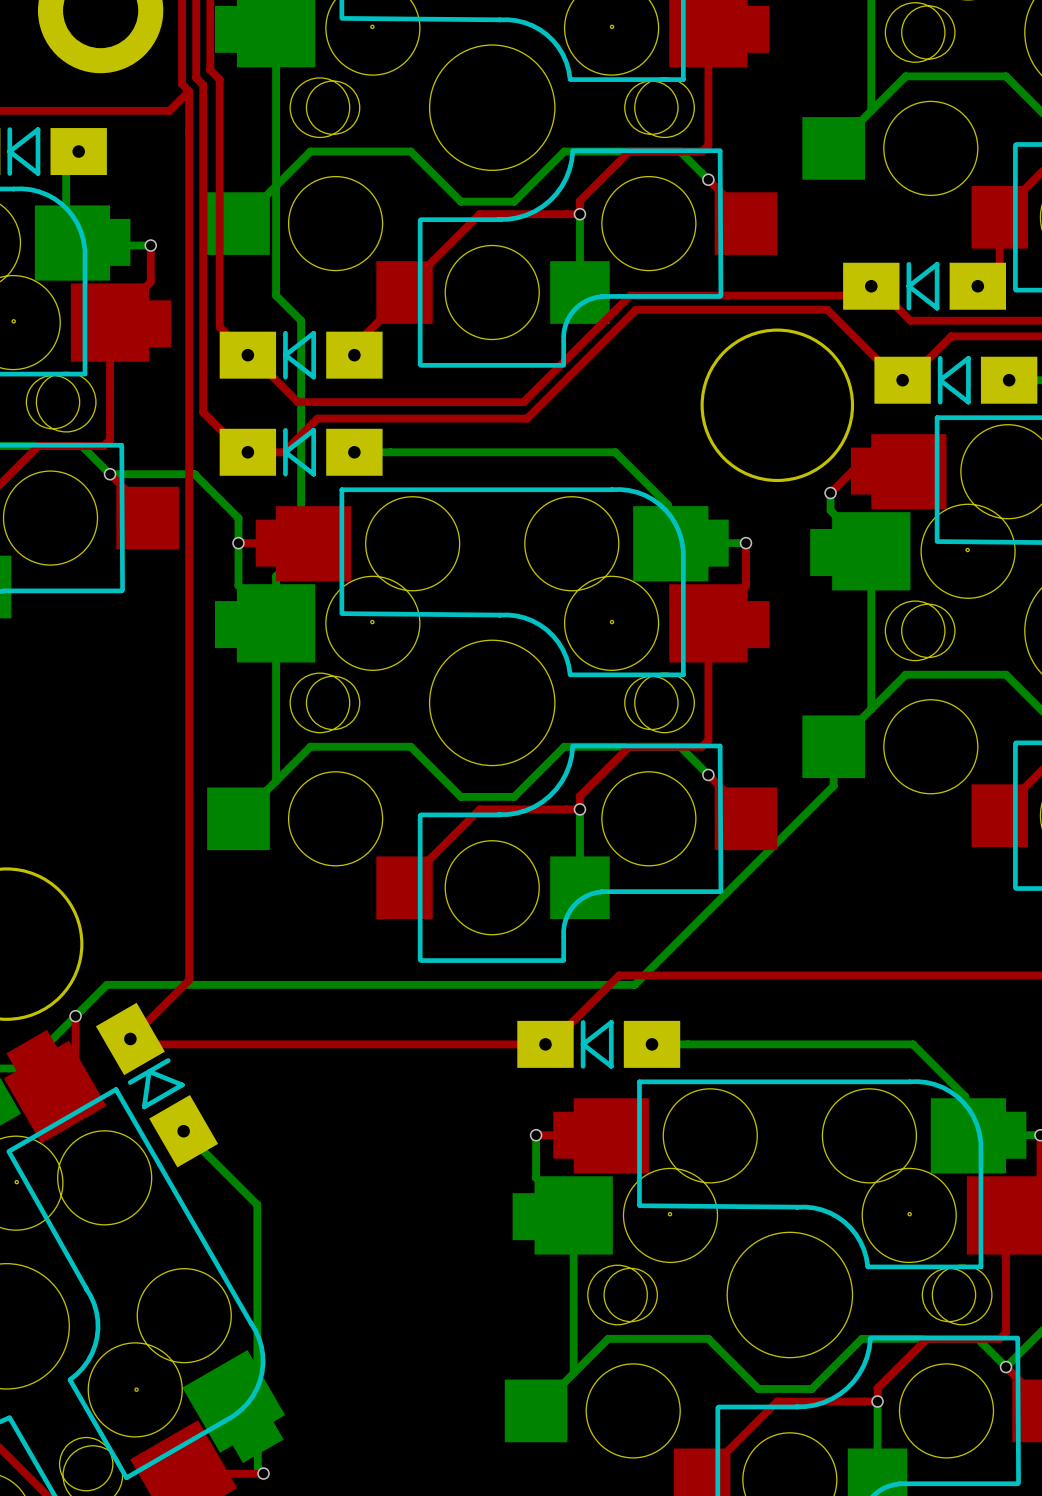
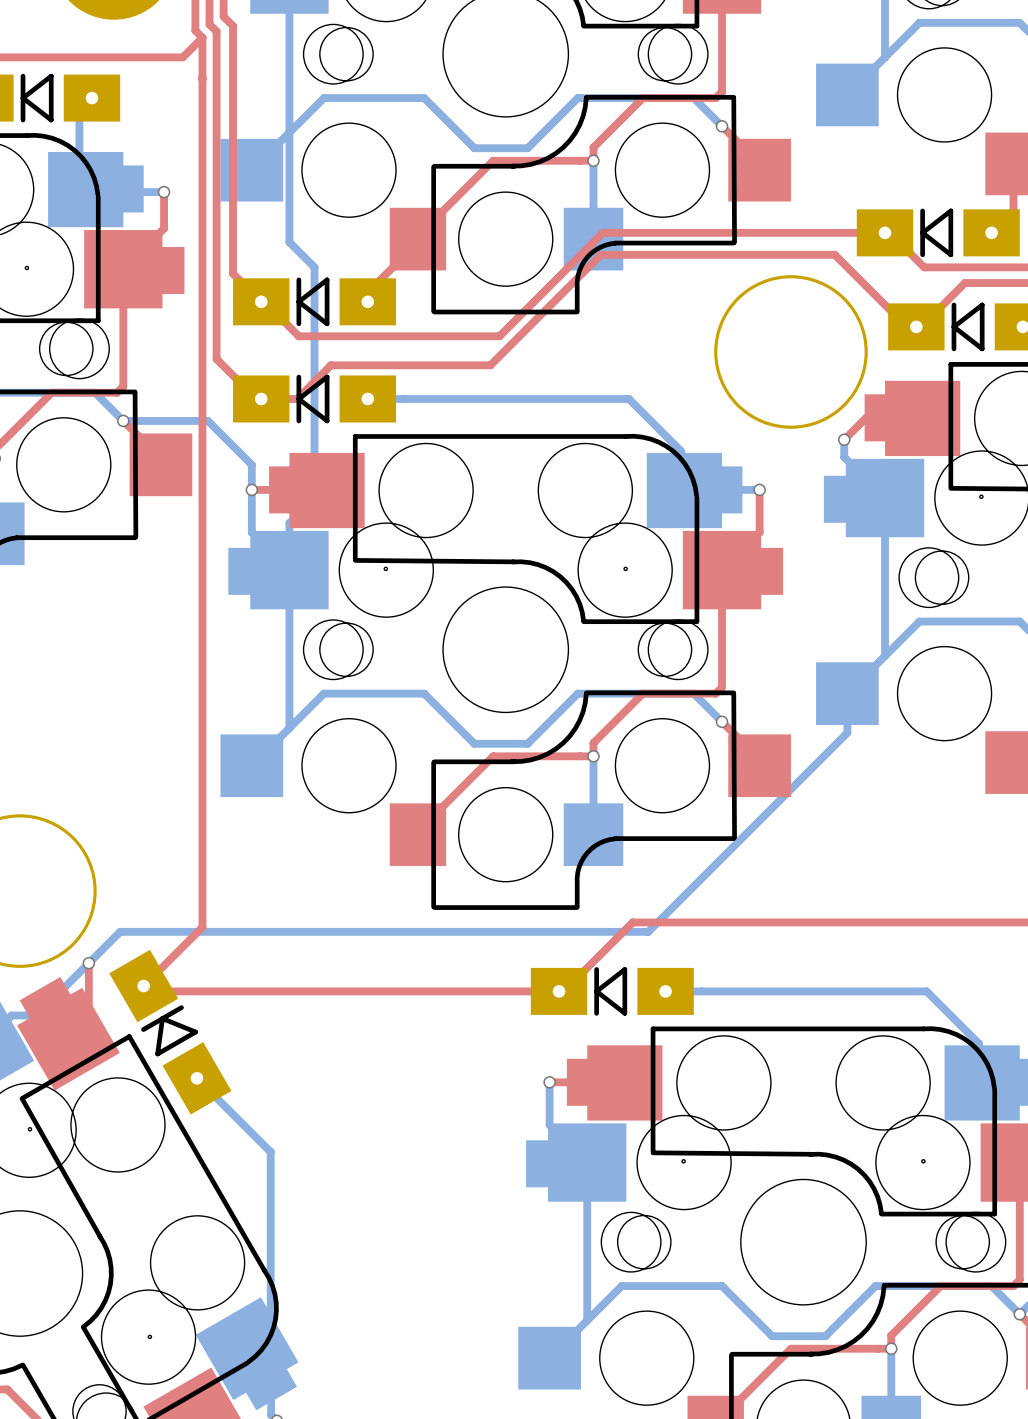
top track: (871, 286) (861, 295) (630, 295) (523, 402) (298, 402) (285, 389) -> (885, 232) (602, 232) (499, 336) (298, 336)
top track: (897, 380) (827, 309) (635, 309) (527, 418) (476, 418) -> (911, 326) (906, 326) (834, 254) (600, 254) (490, 365)

